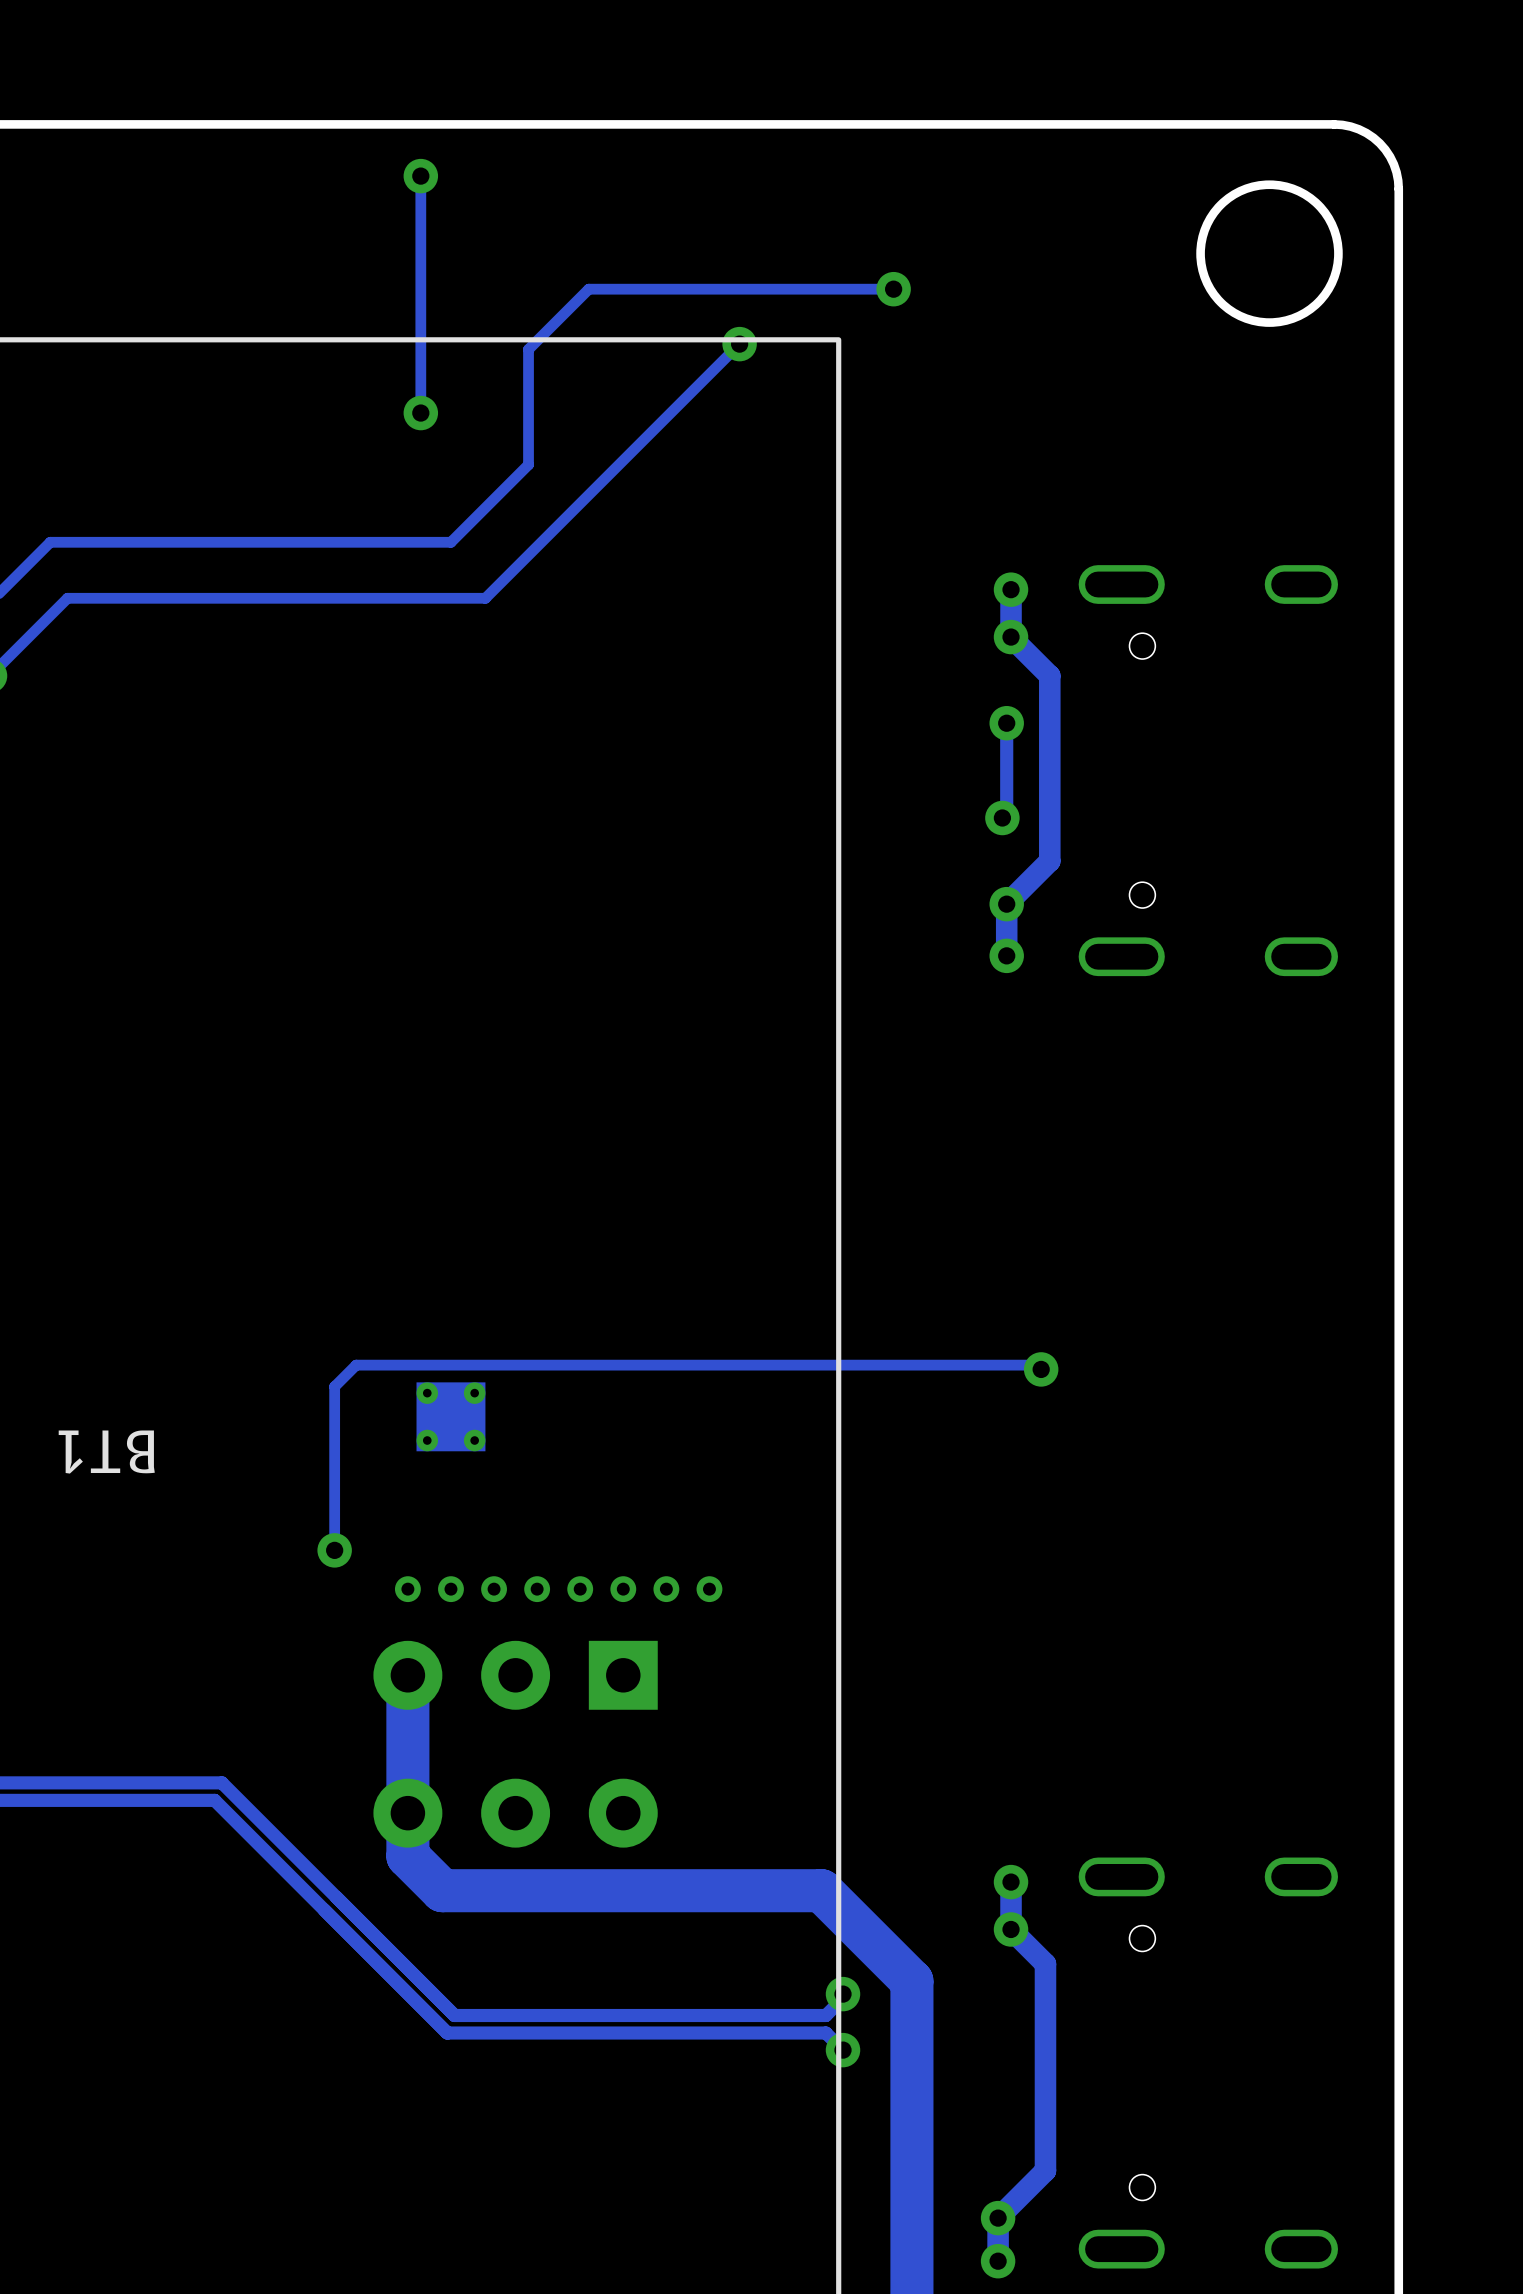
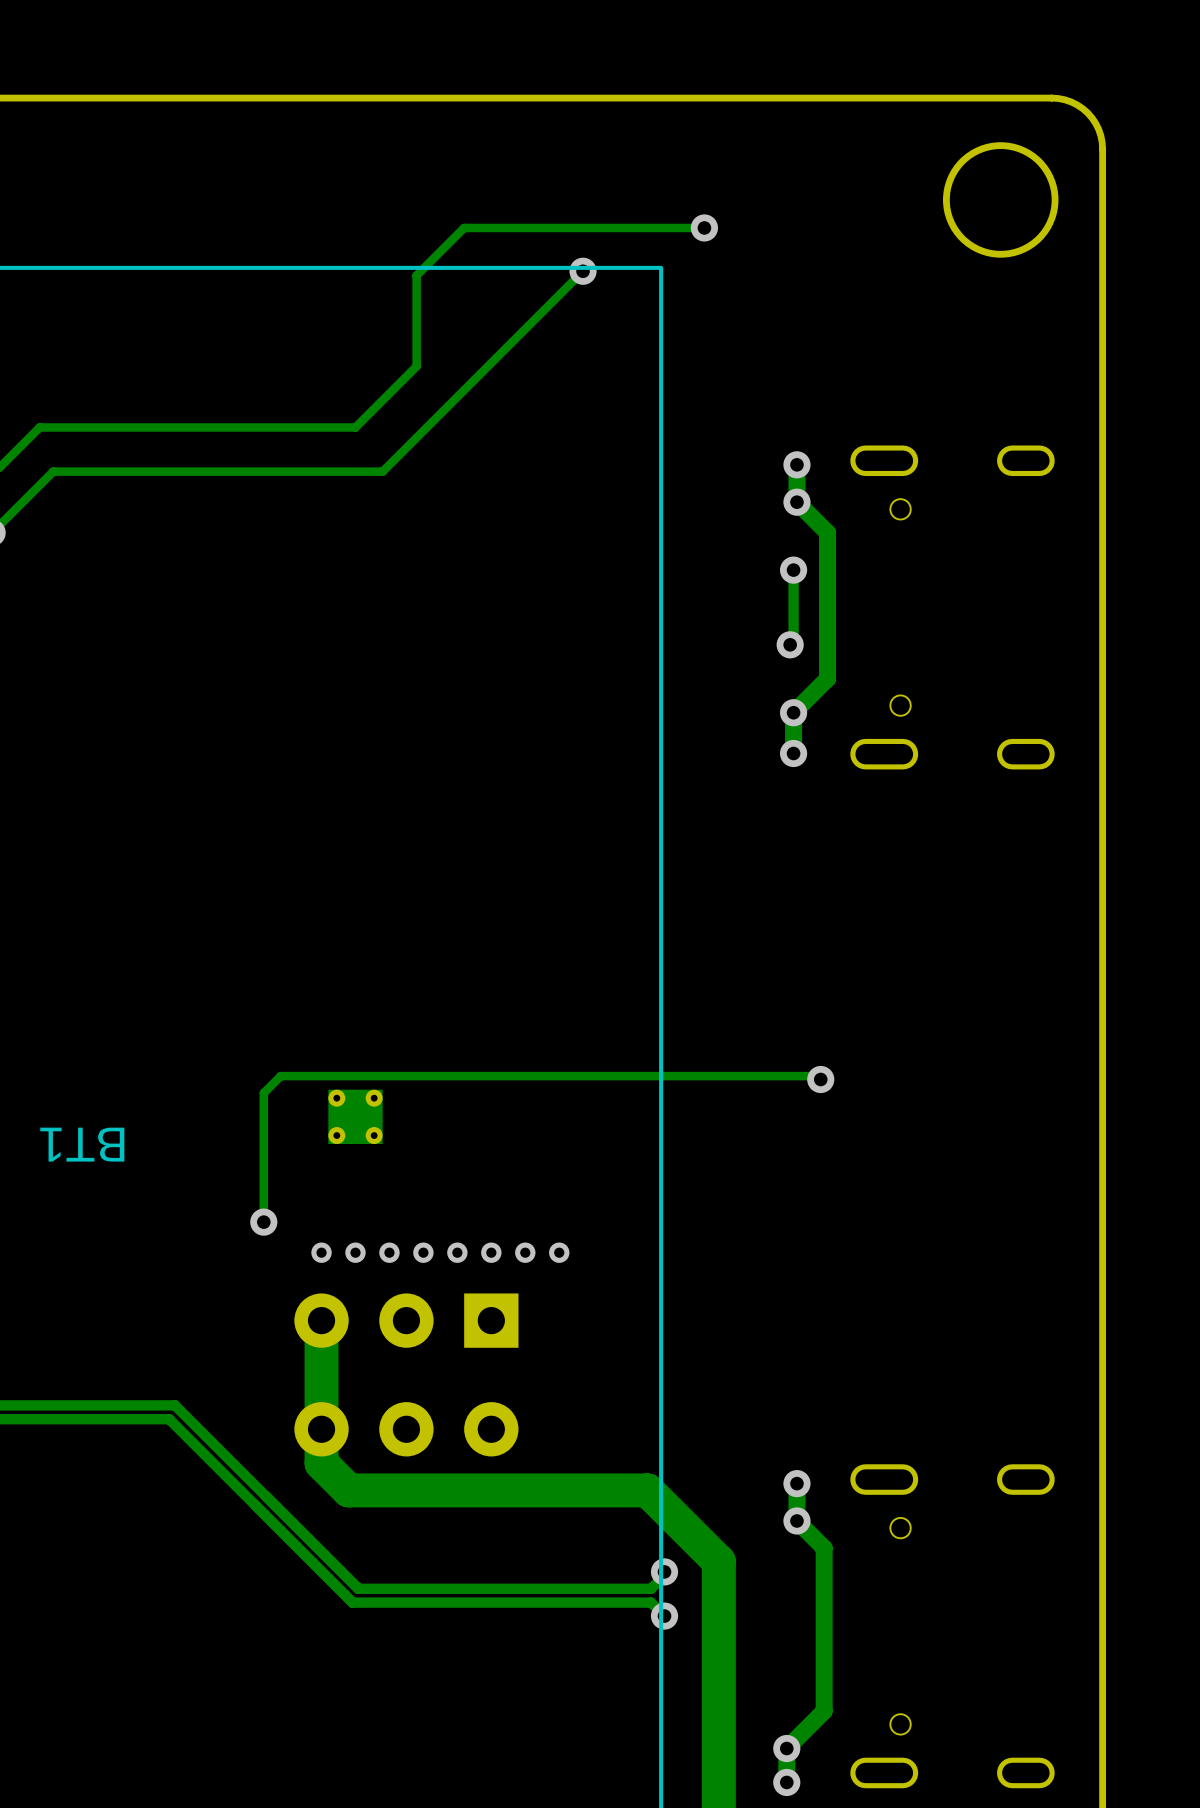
track: (420, 176) (420, 413) -> none
via: (420, 176) -> none
via: (420, 413) -> none

